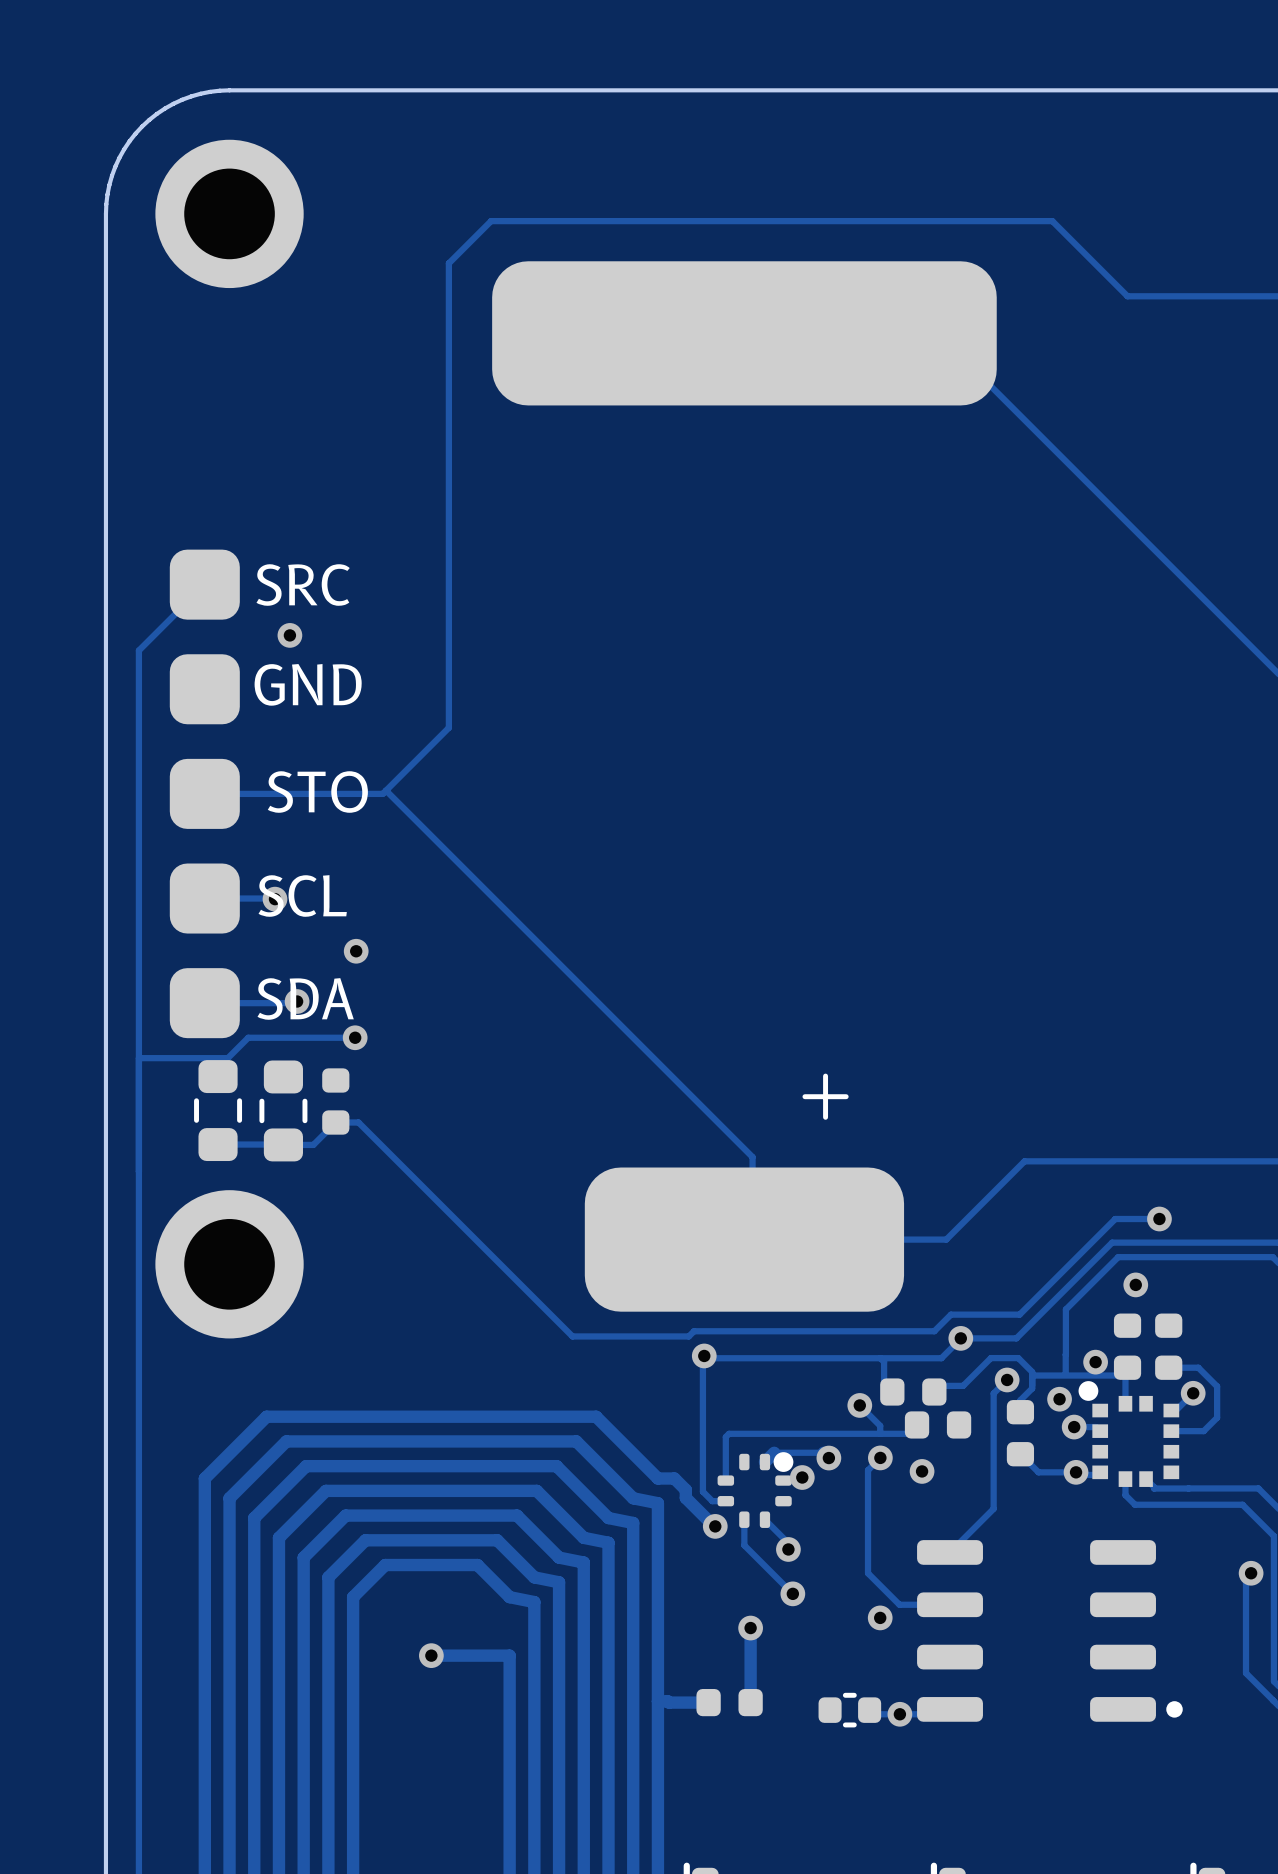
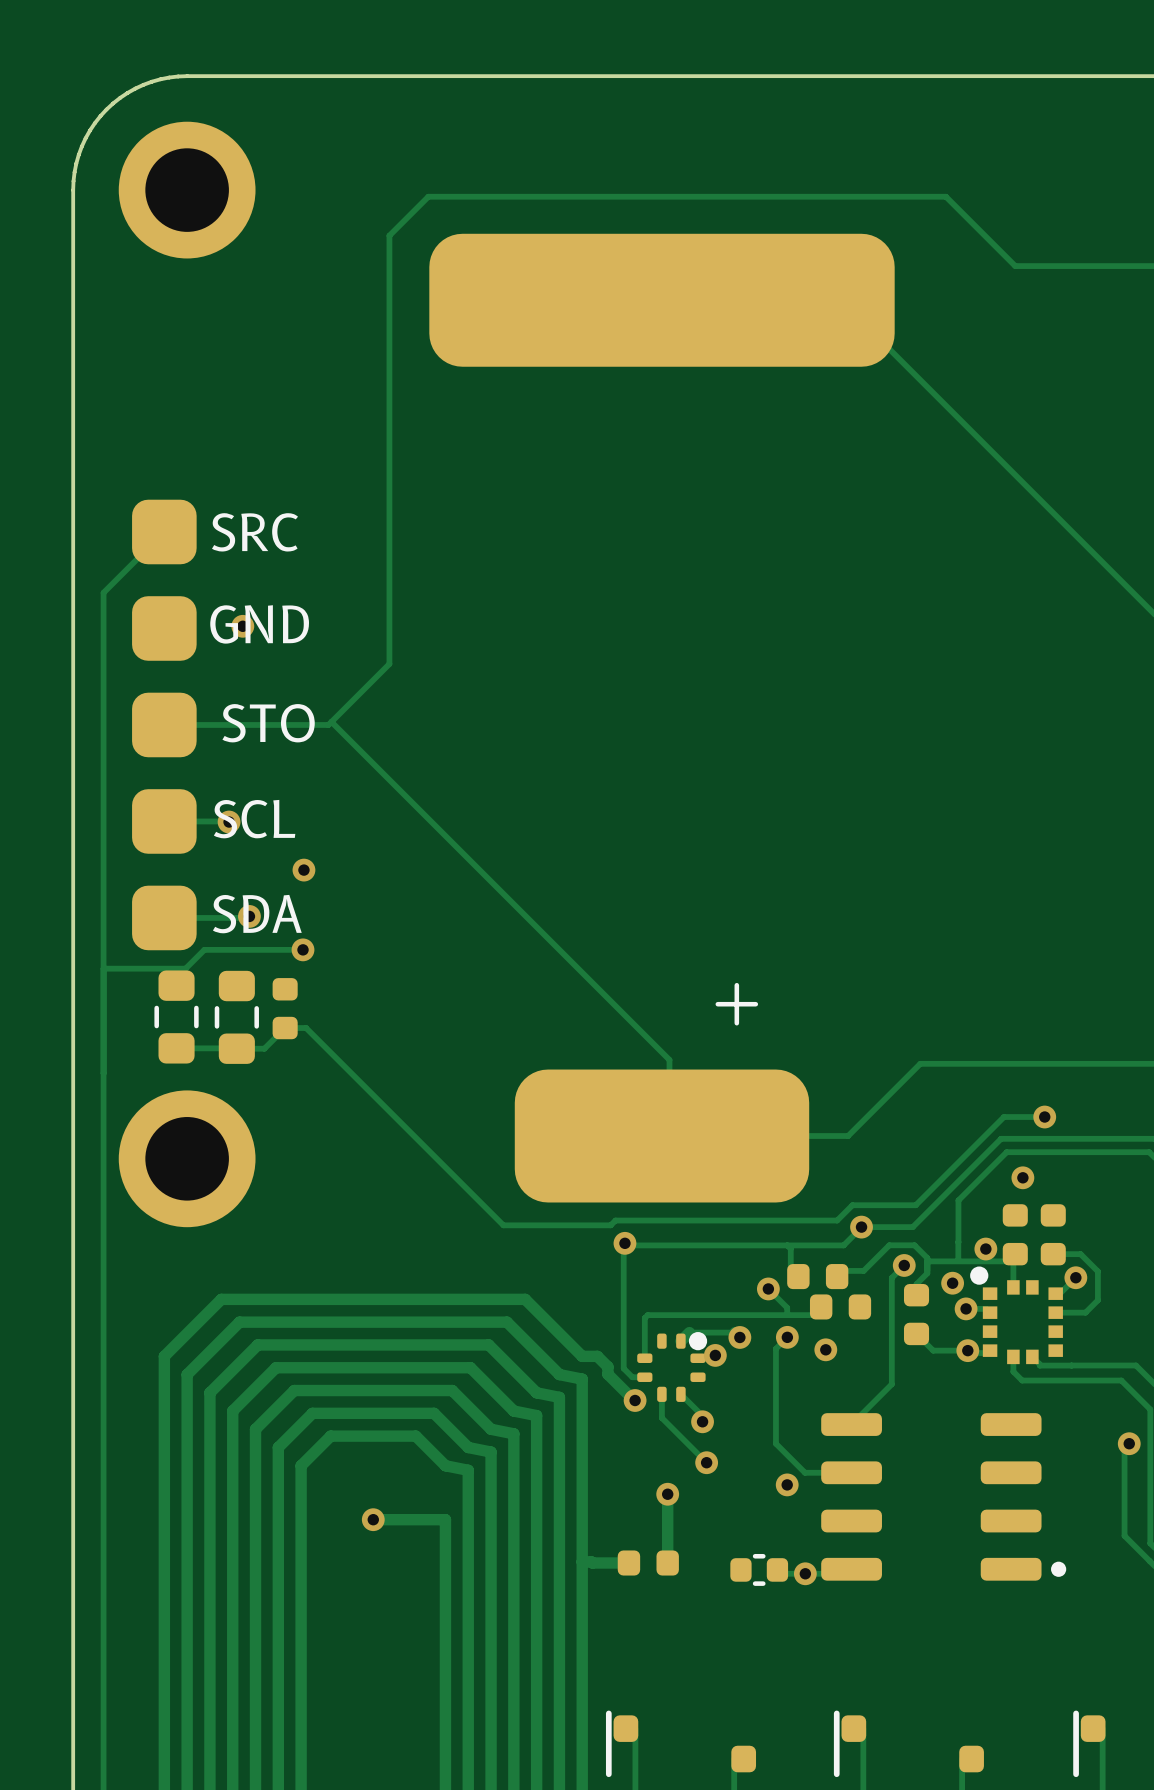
via position: (289, 635) -> (242, 626)

